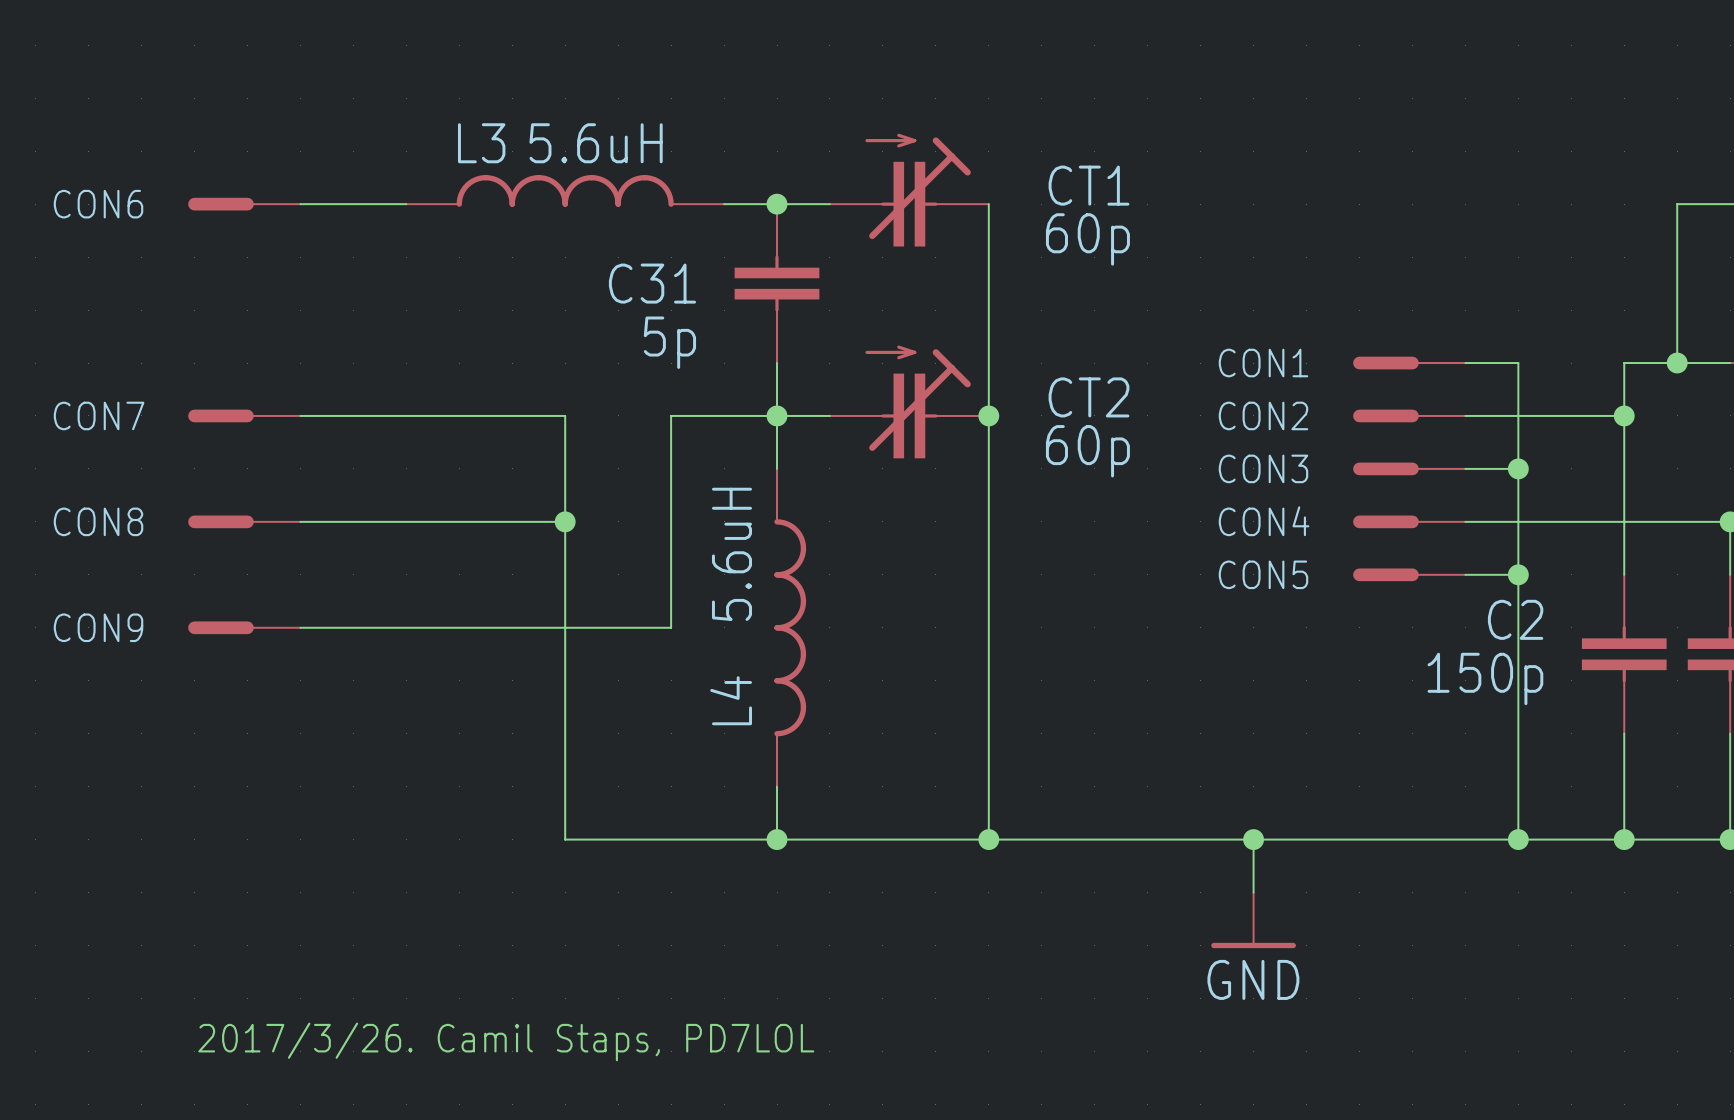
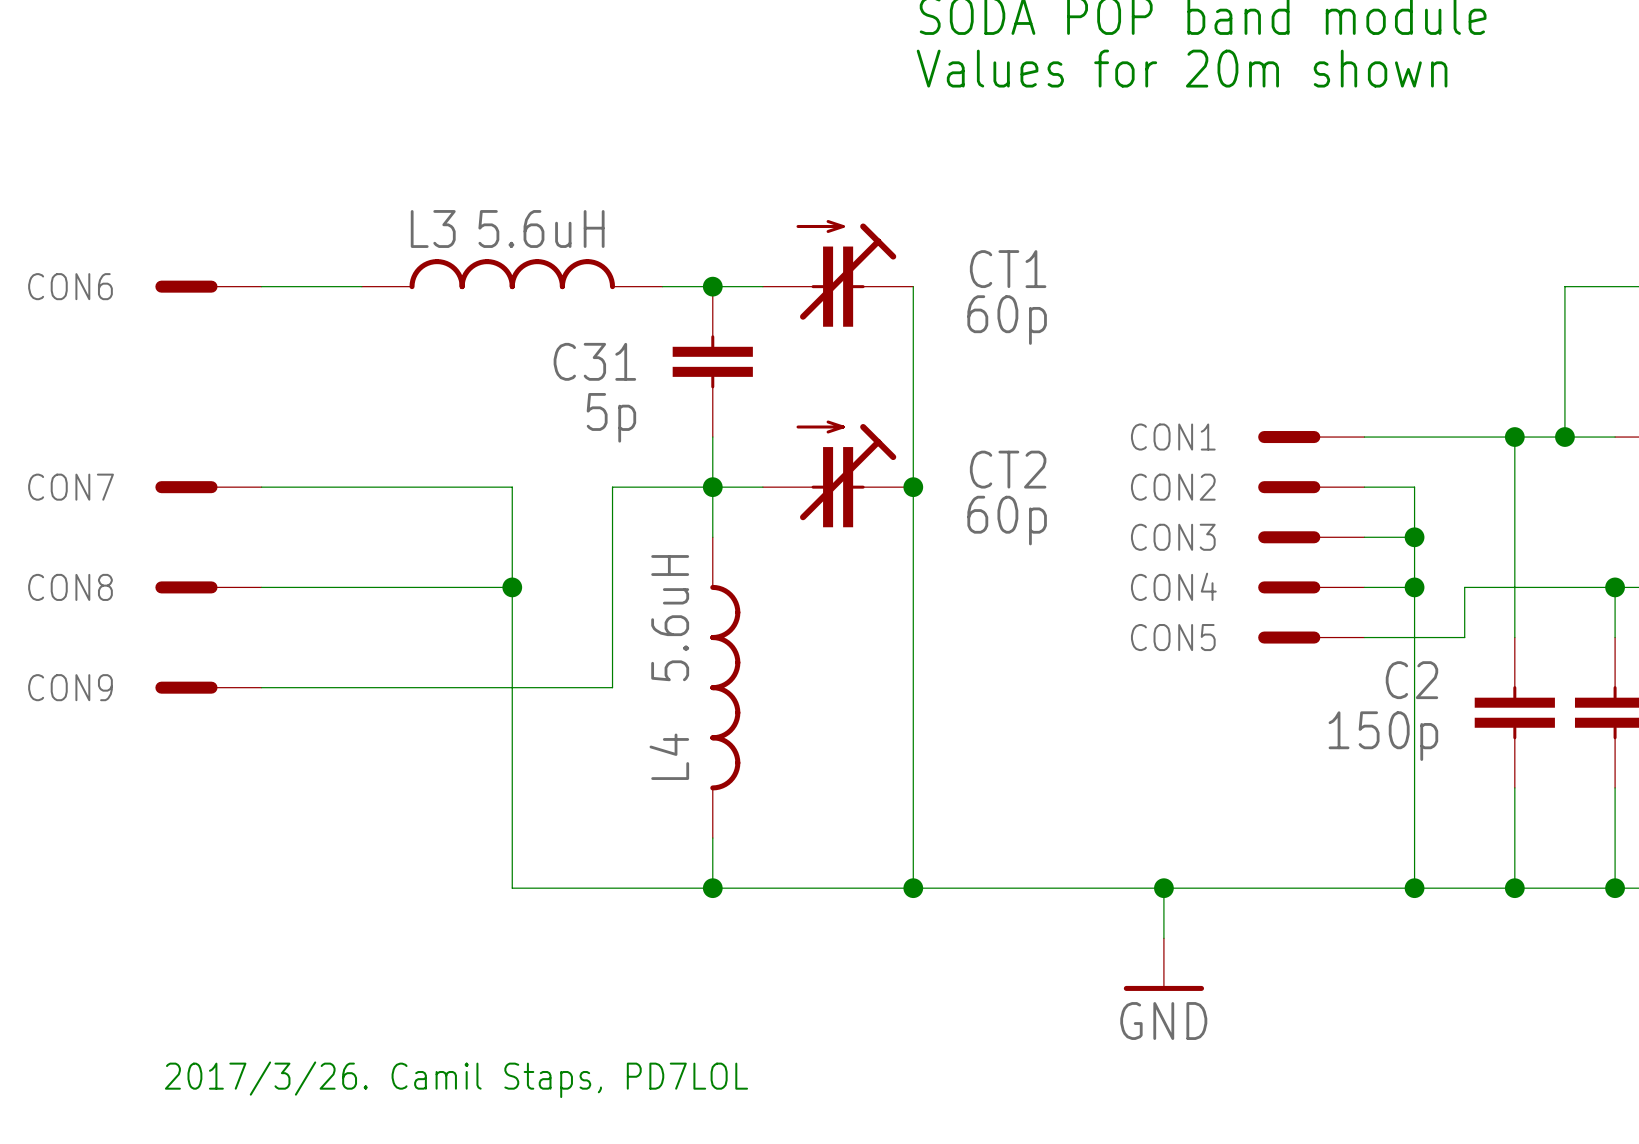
wire: (1518, 363) (1518, 415) (1624, 415) -> (1414, 437) (1514, 437)
junction position: (1624, 415) -> (1514, 437)
wire: (1518, 521) (1571, 521) -> (1414, 637) (1464, 637) (1464, 587)
junction position: (1518, 574) -> (1414, 587)

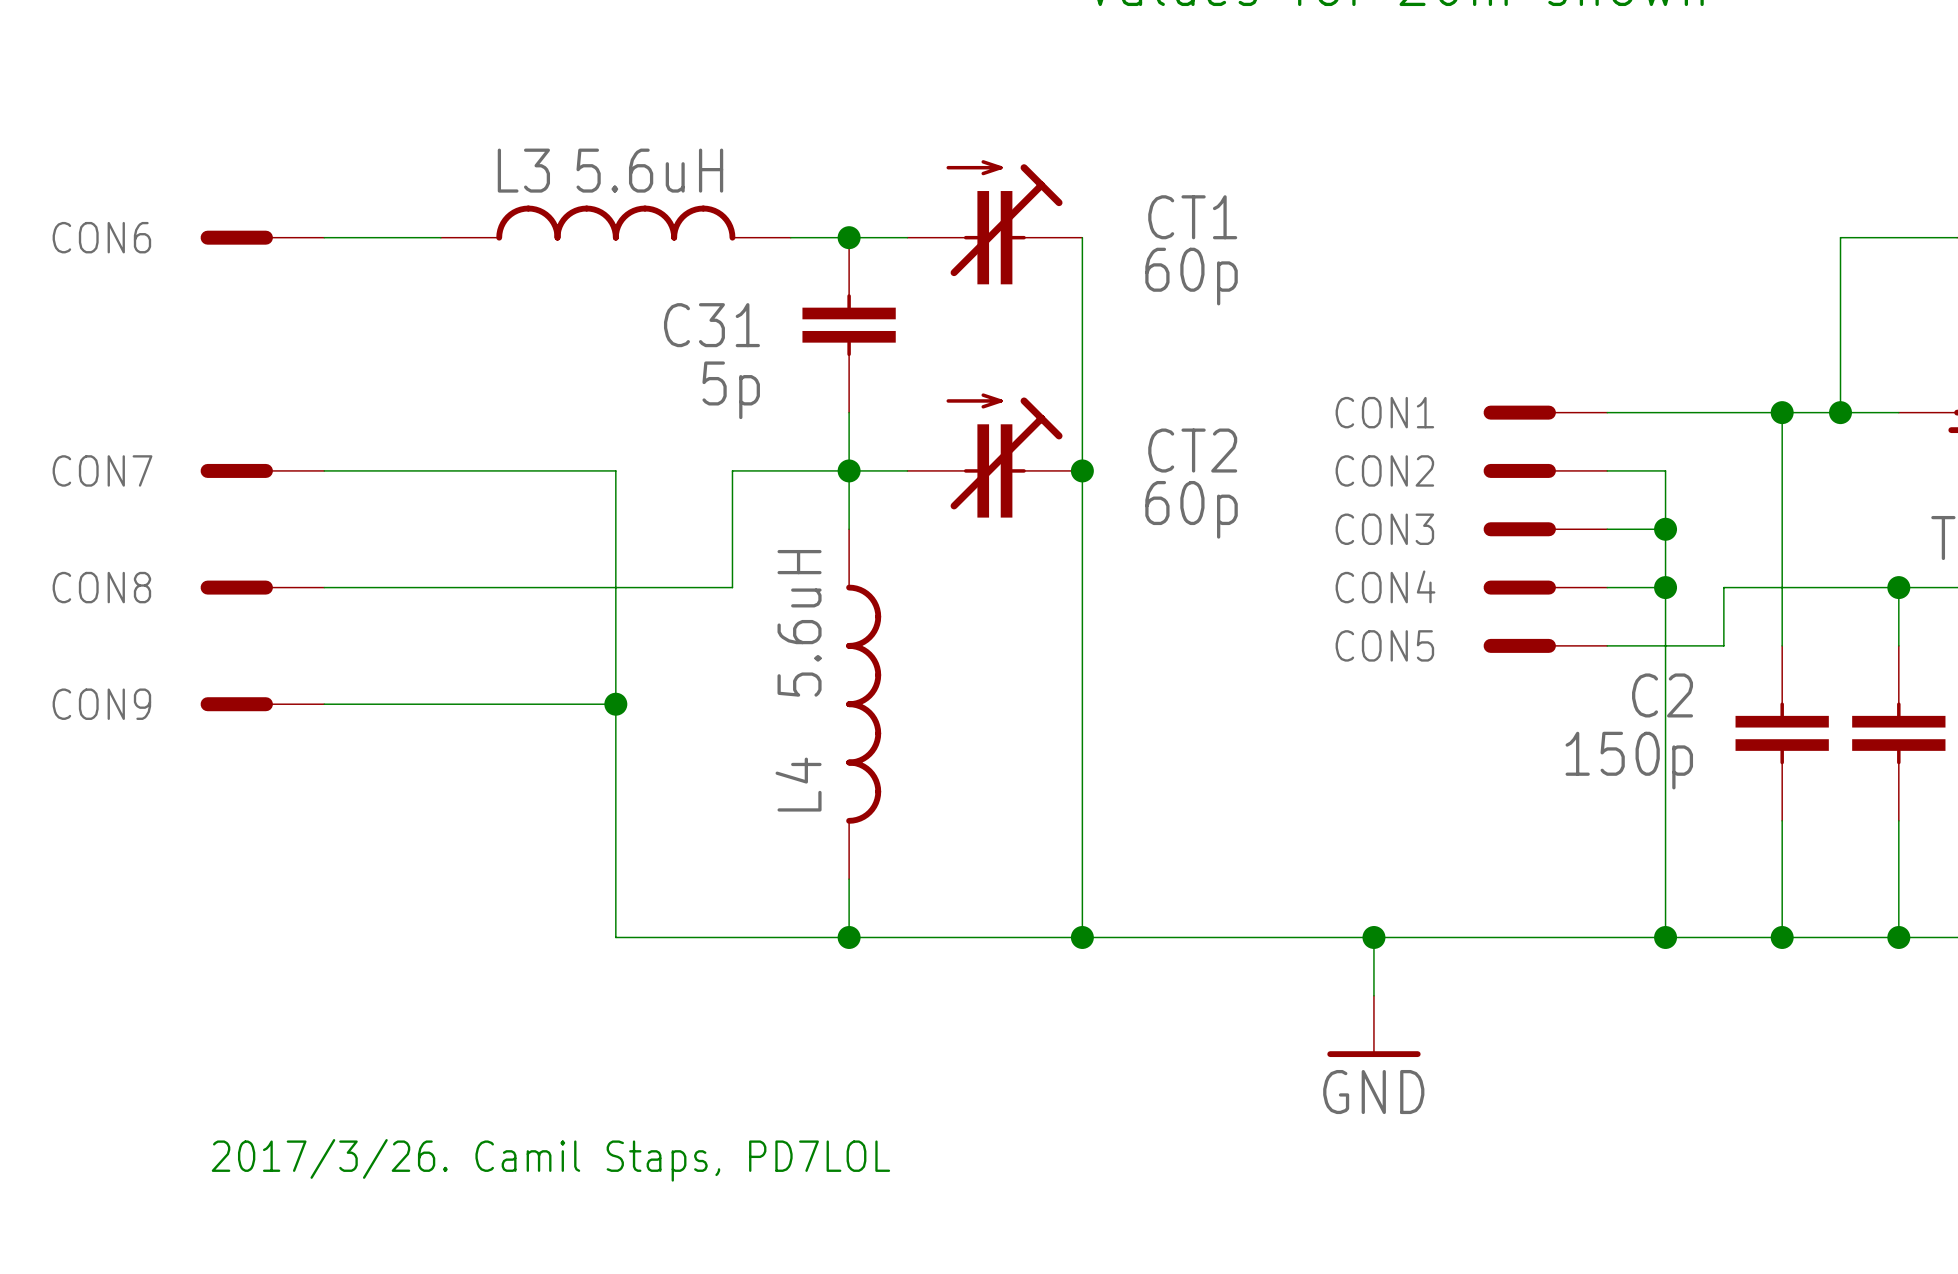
junction position: (512, 587) -> (615, 704)
wire: (612, 587) (612, 687) (512, 687) -> (732, 587) (615, 587)

